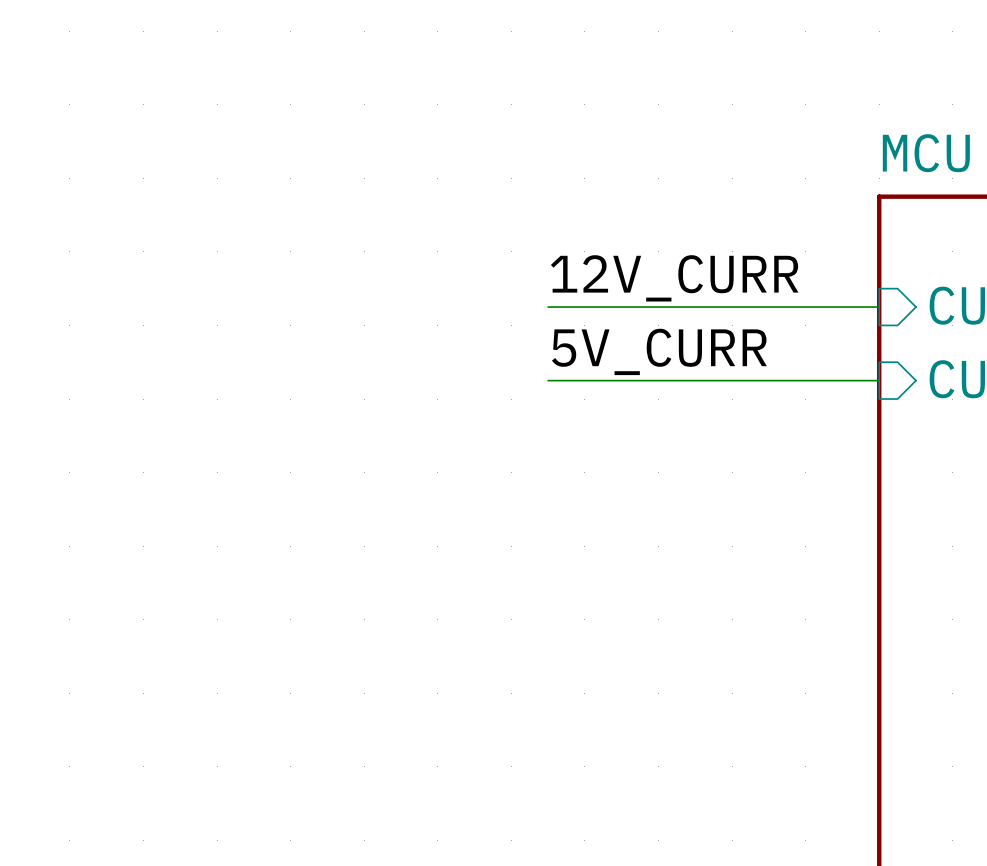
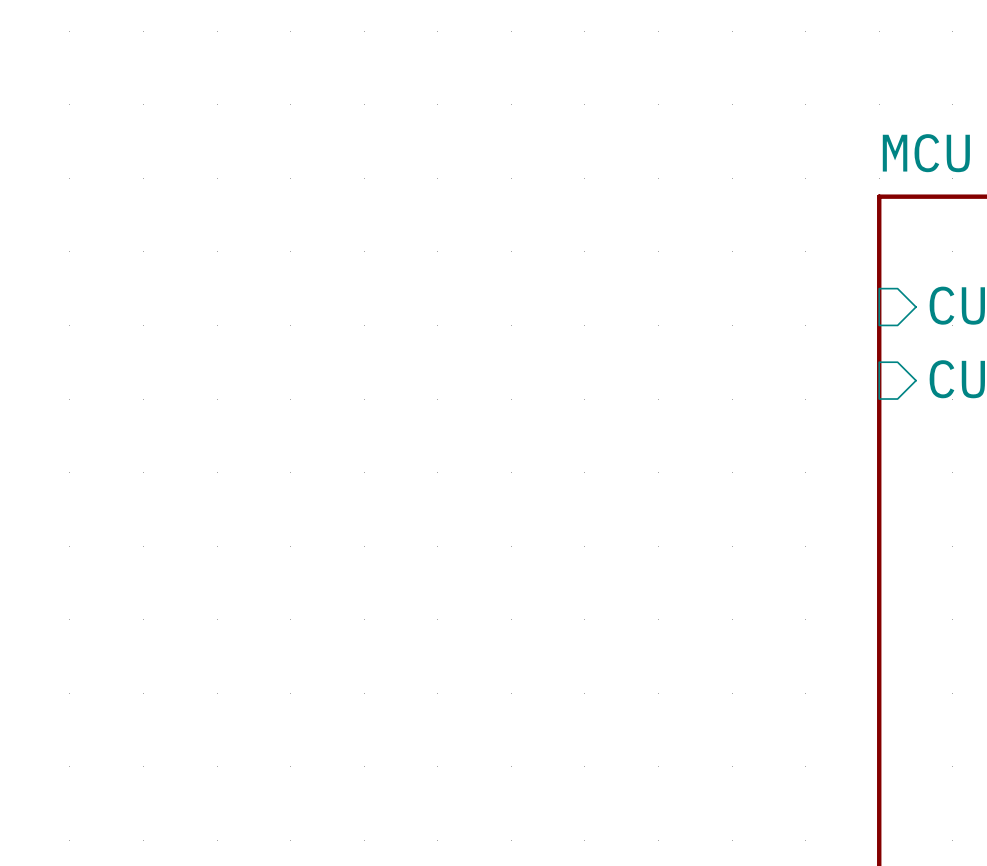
label: 12V_CURR (674, 278) -> none
wire: (548, 307) (879, 307) -> none
label: 5V_CURR (659, 351) -> none
wire: (548, 380) (879, 380) -> none

